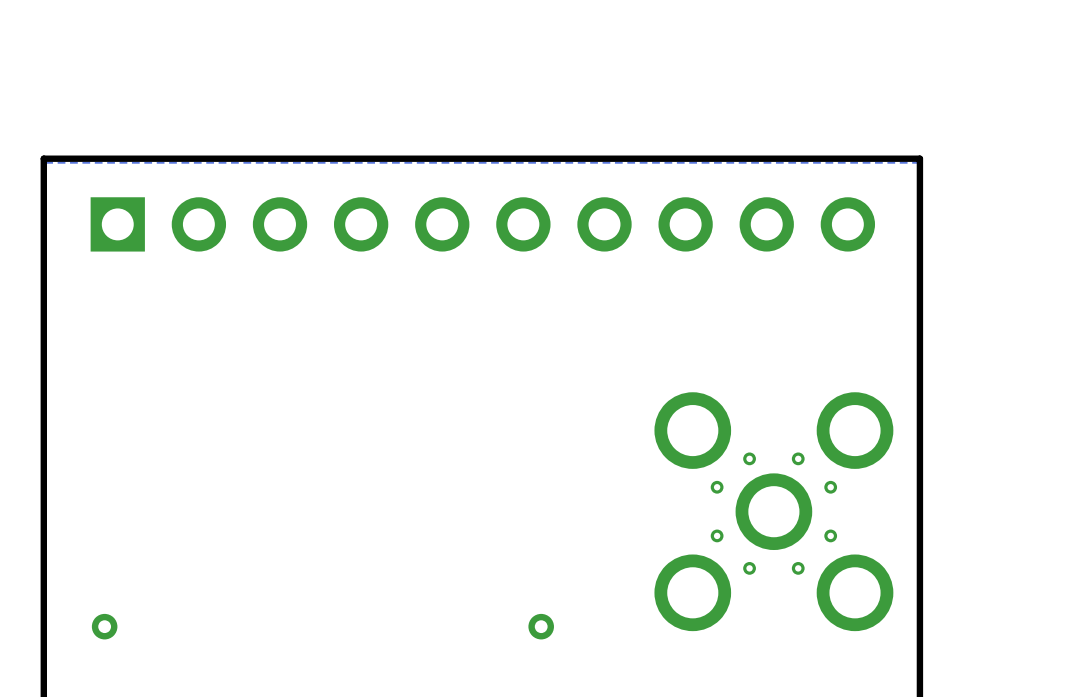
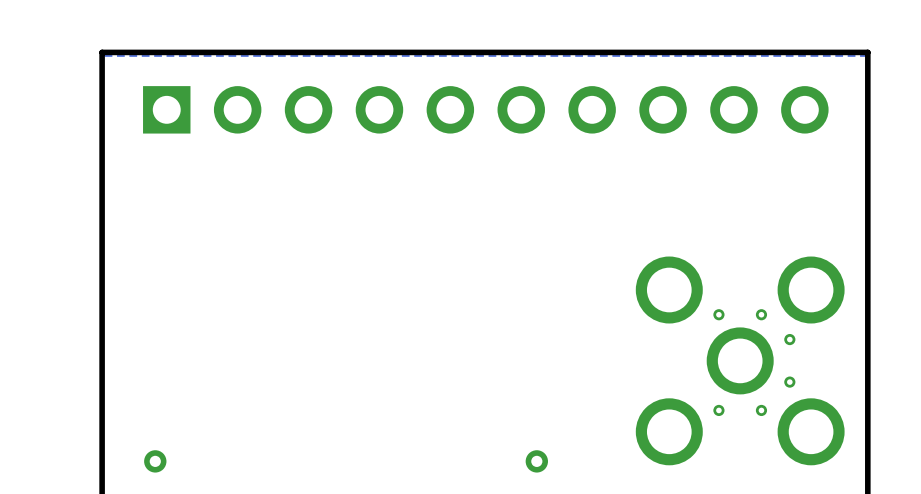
via: (717, 487) -> none
via: (717, 535) -> none

